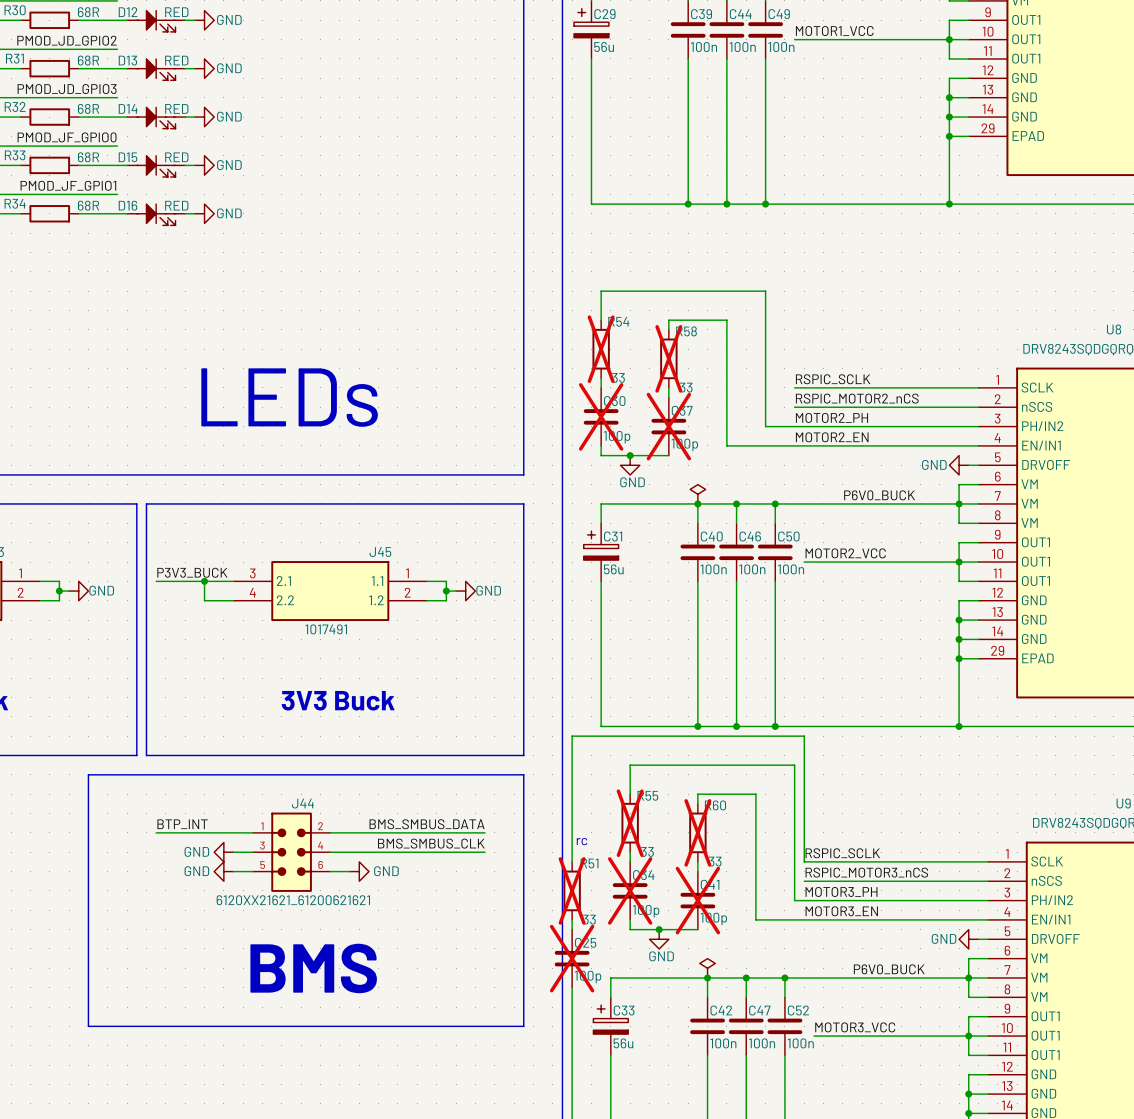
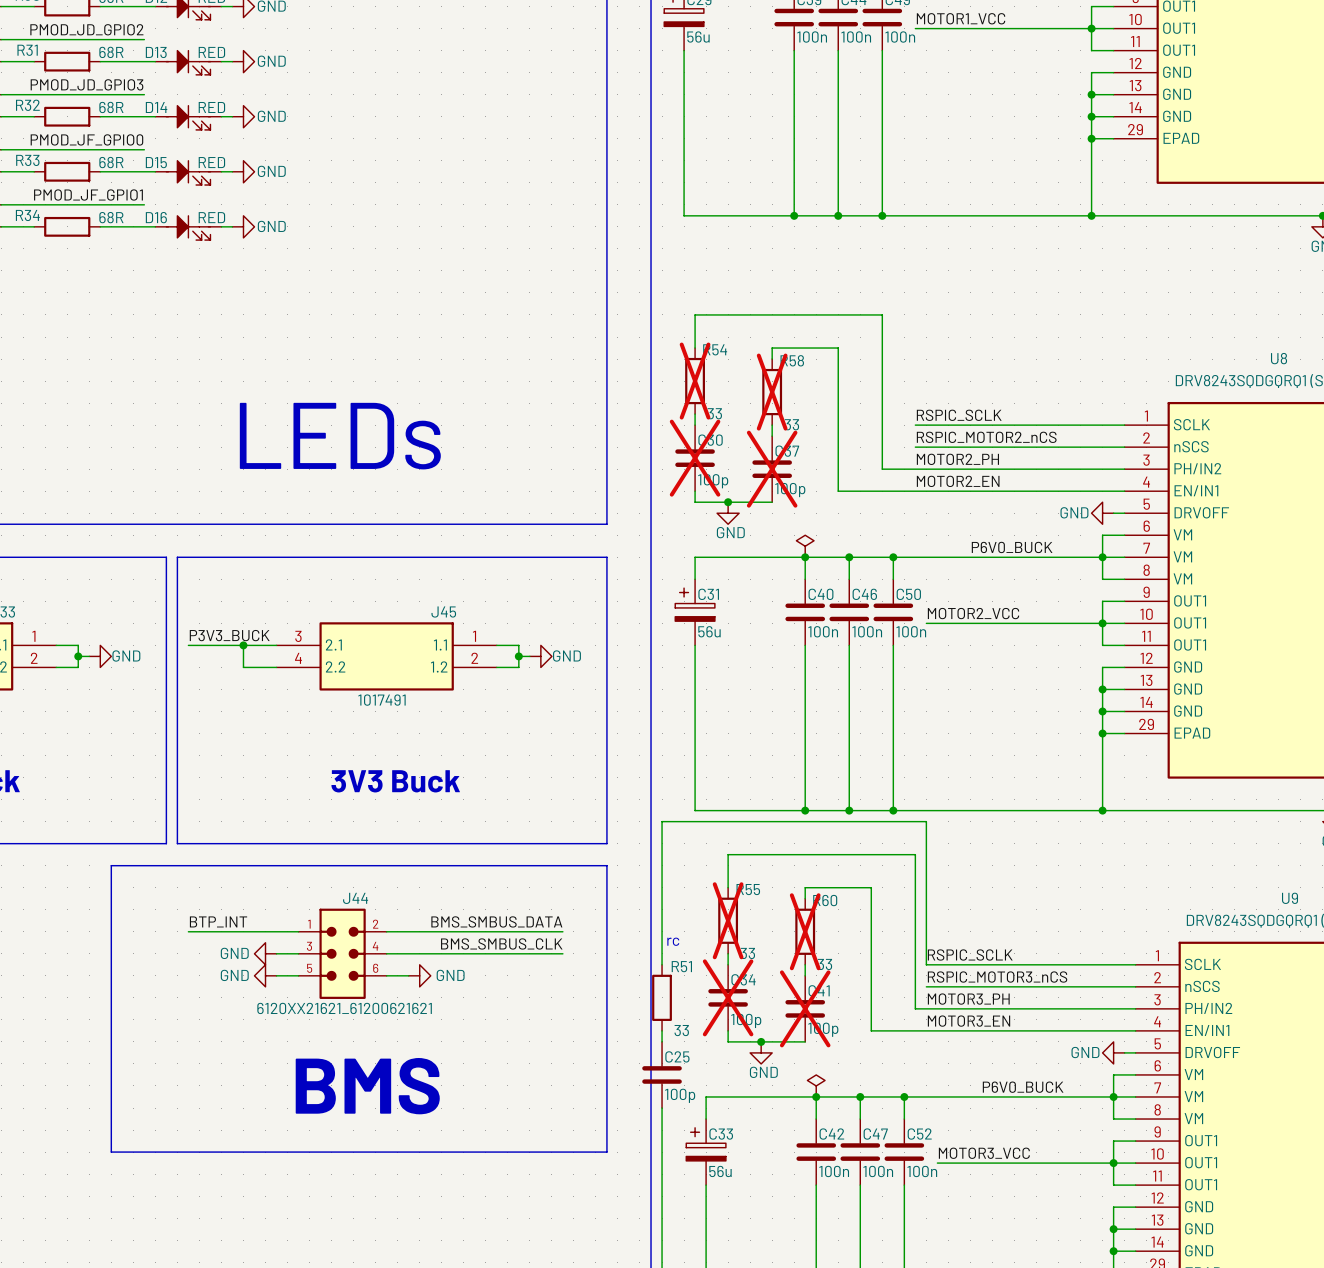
R51 do-not-place cross: (572, 890) -> none
C25 do-not-place cross: (572, 958) -> none

